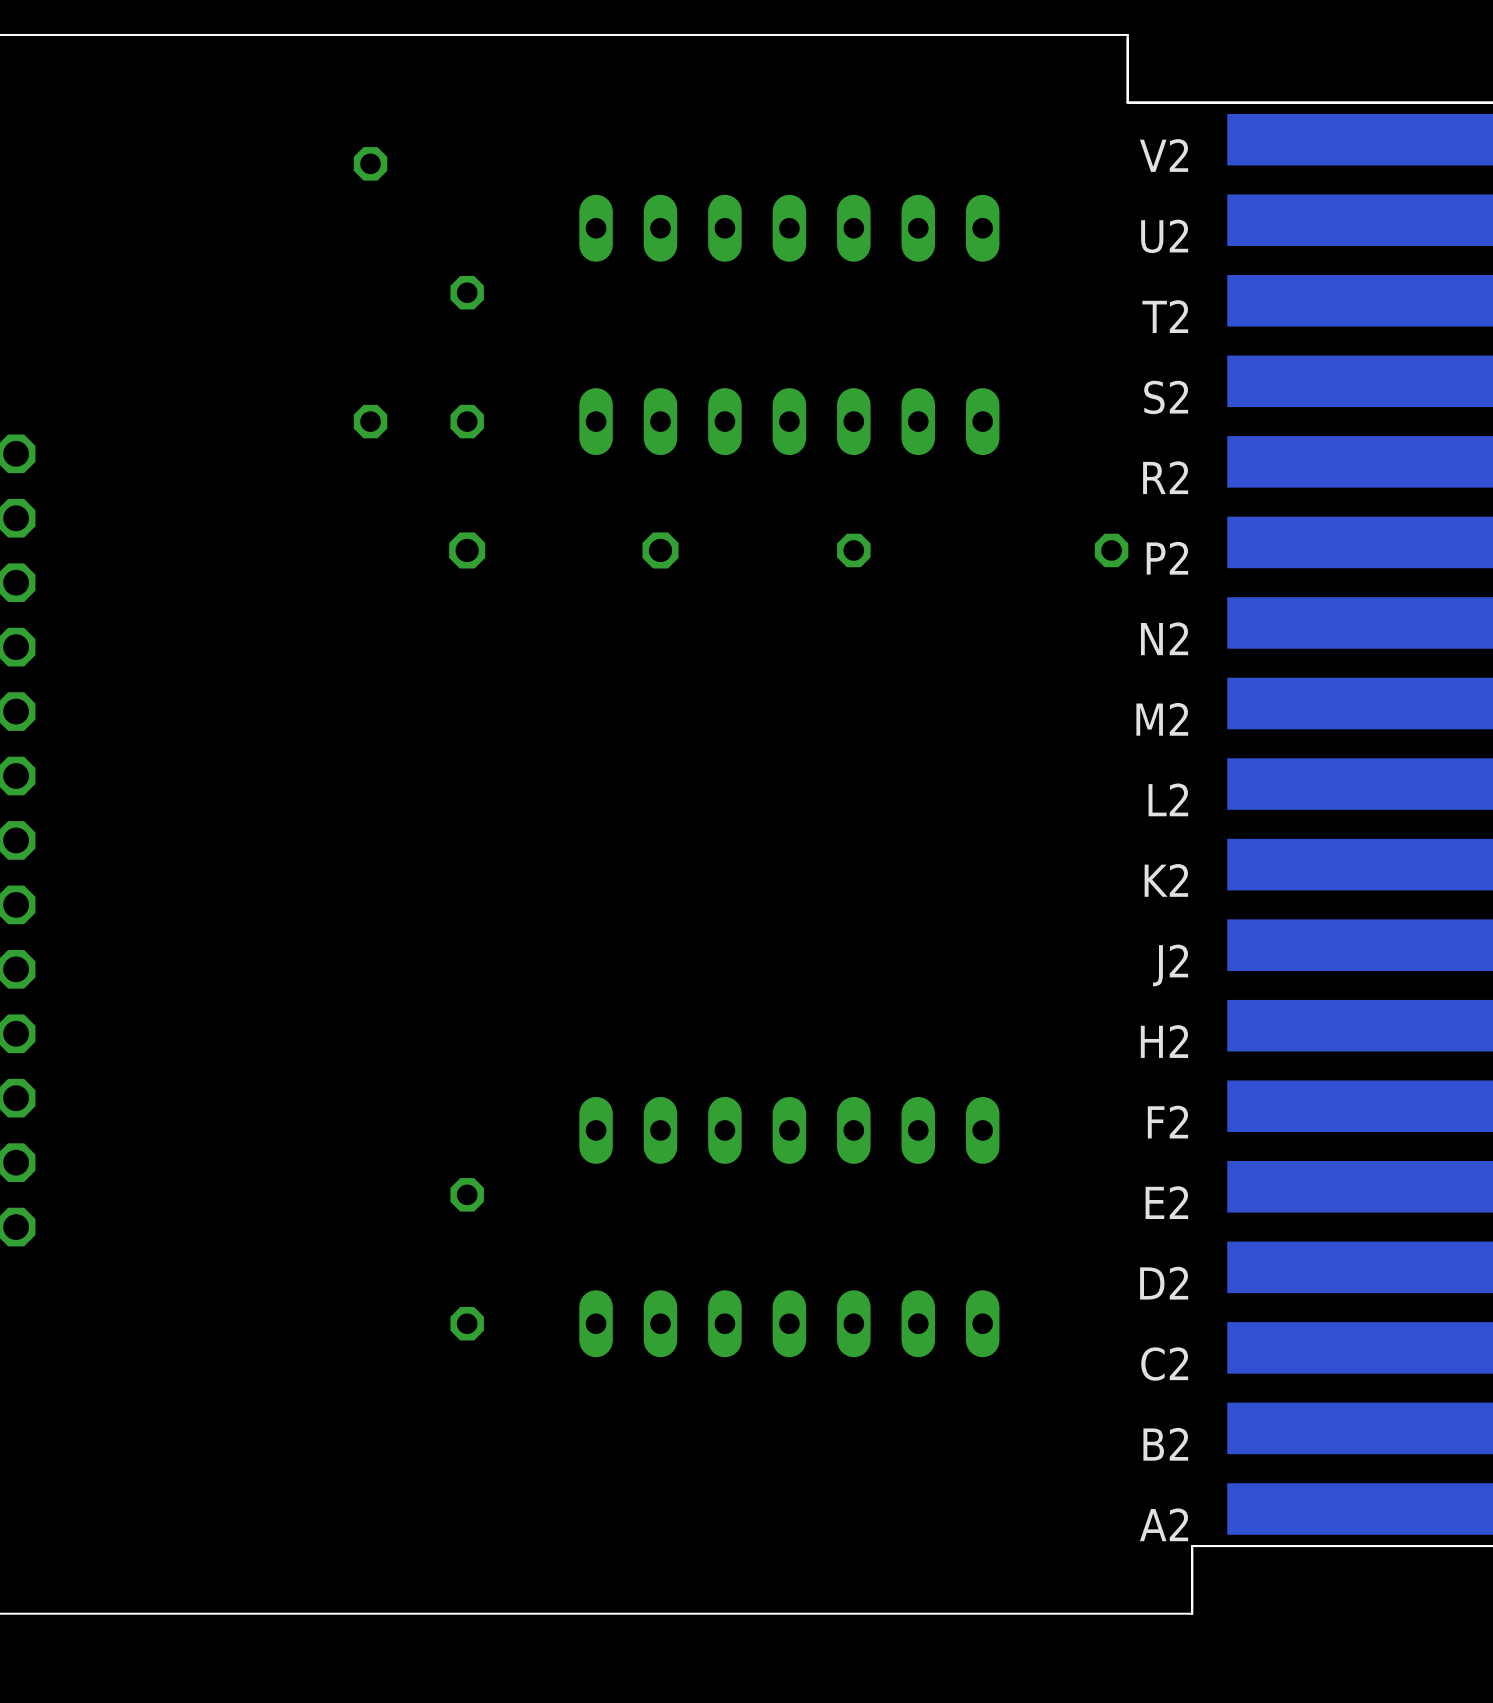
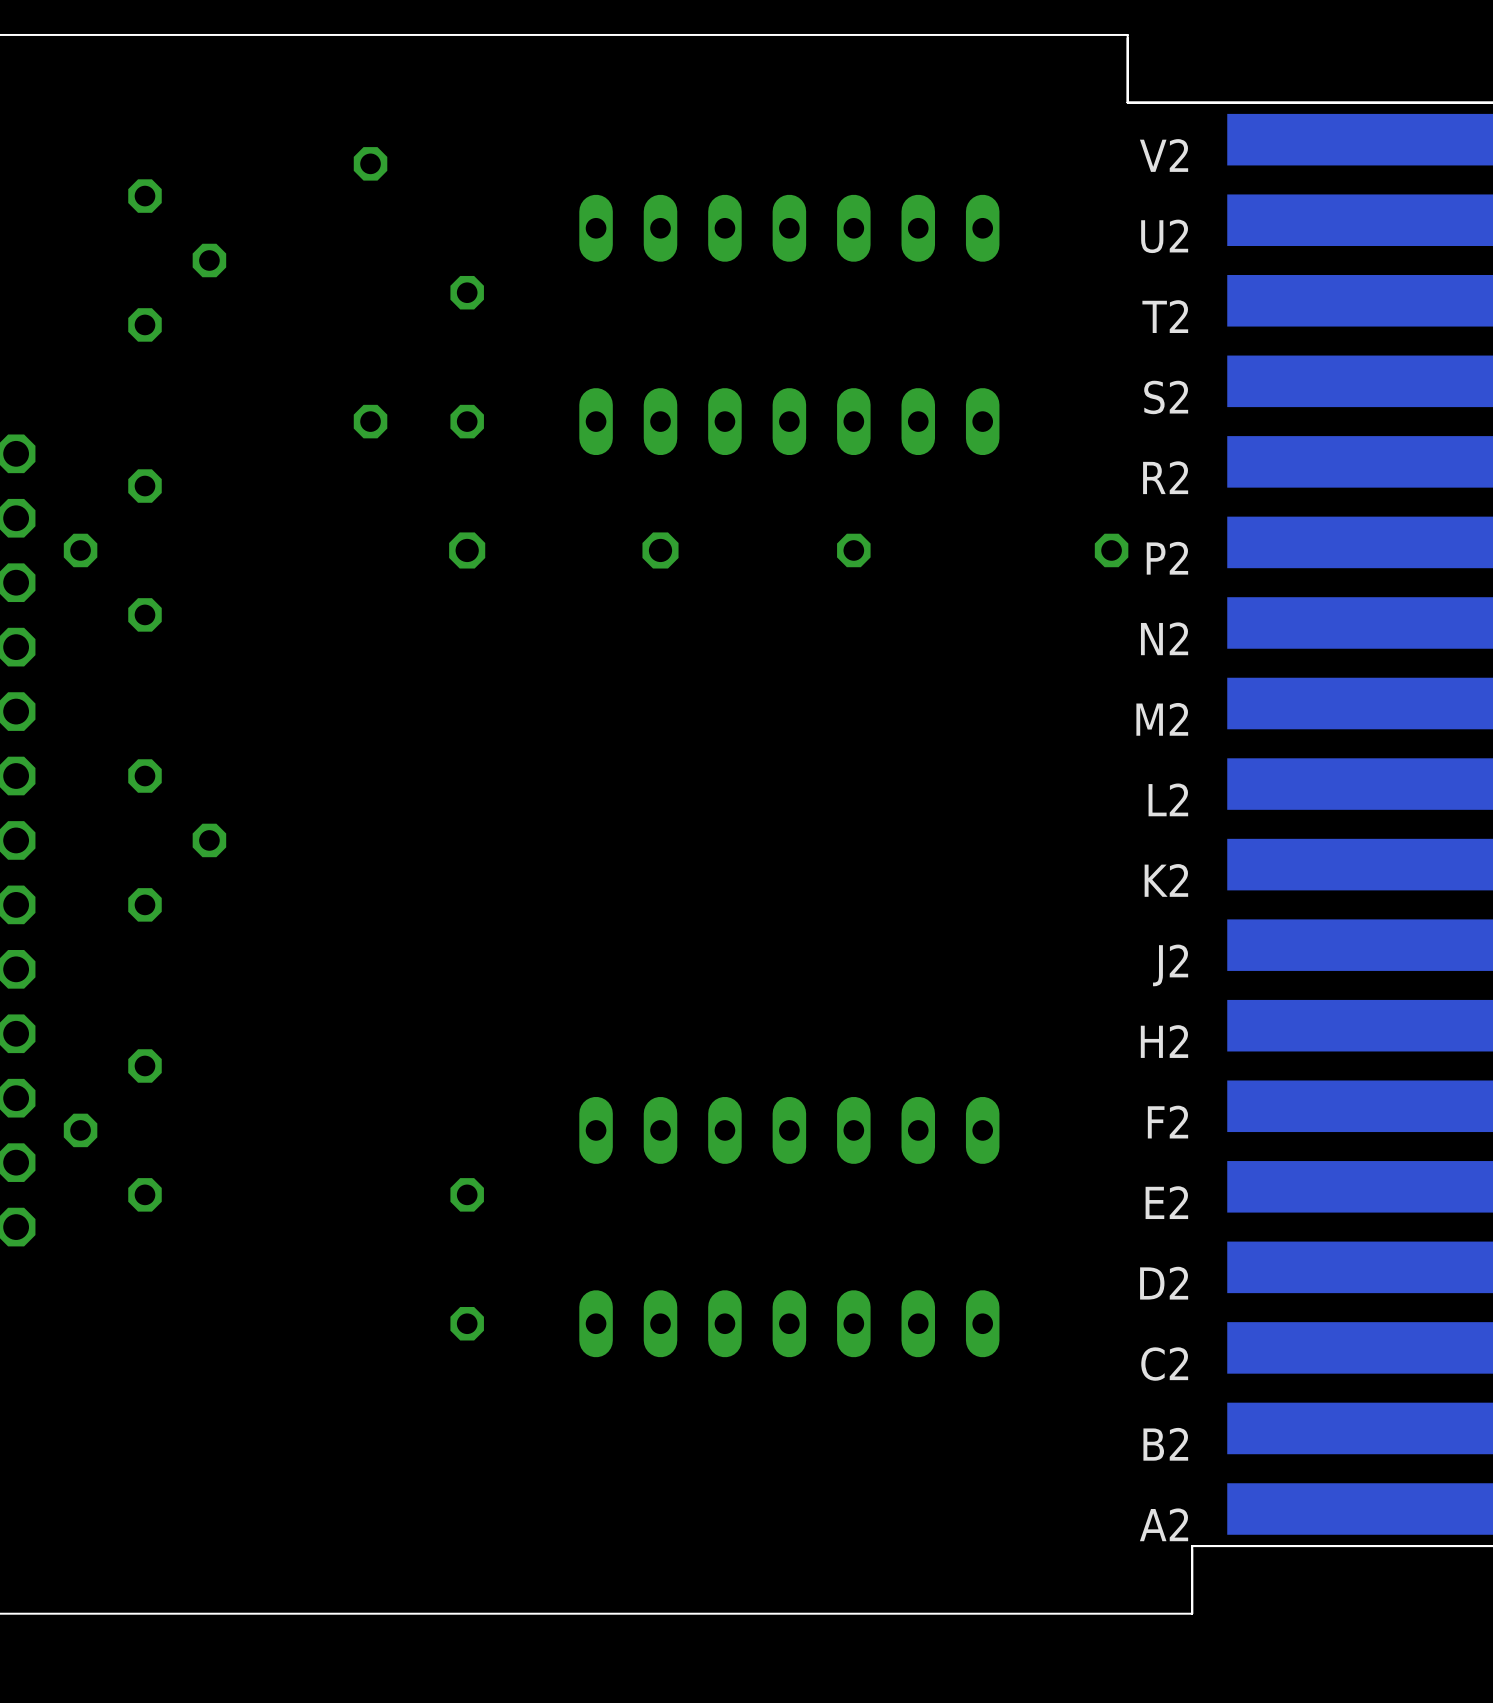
part: none -> (177, 260)
part: none -> (112, 550)
part: none -> (177, 840)
part: none -> (112, 1130)

